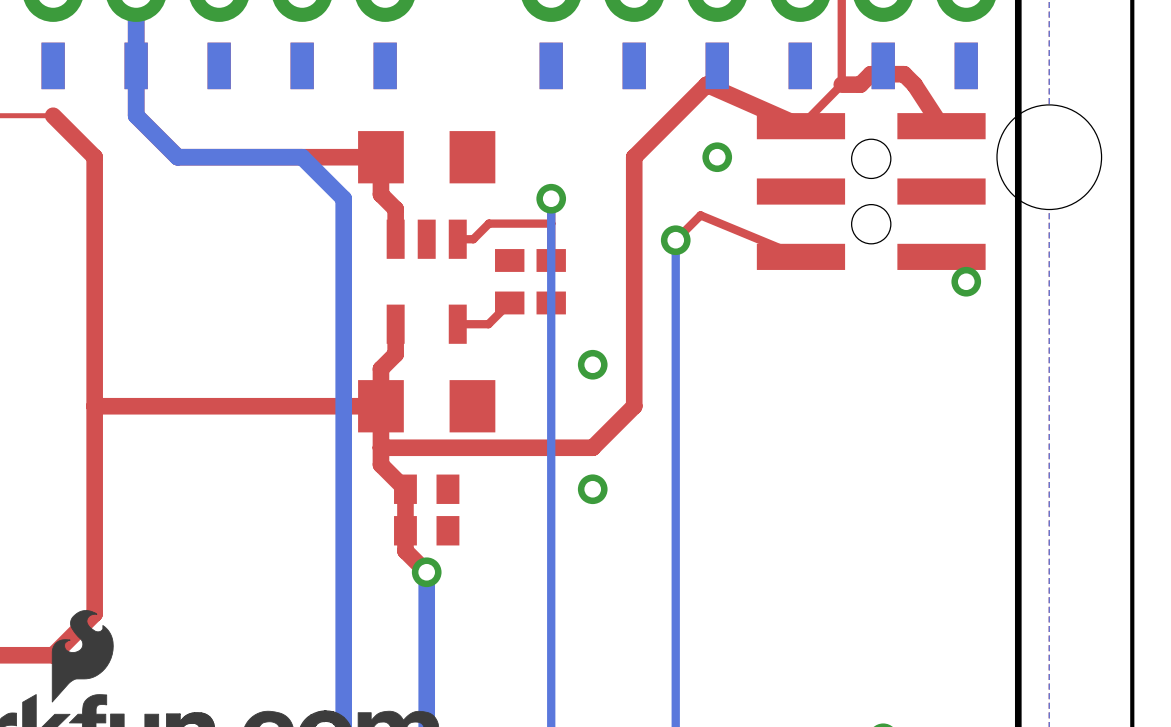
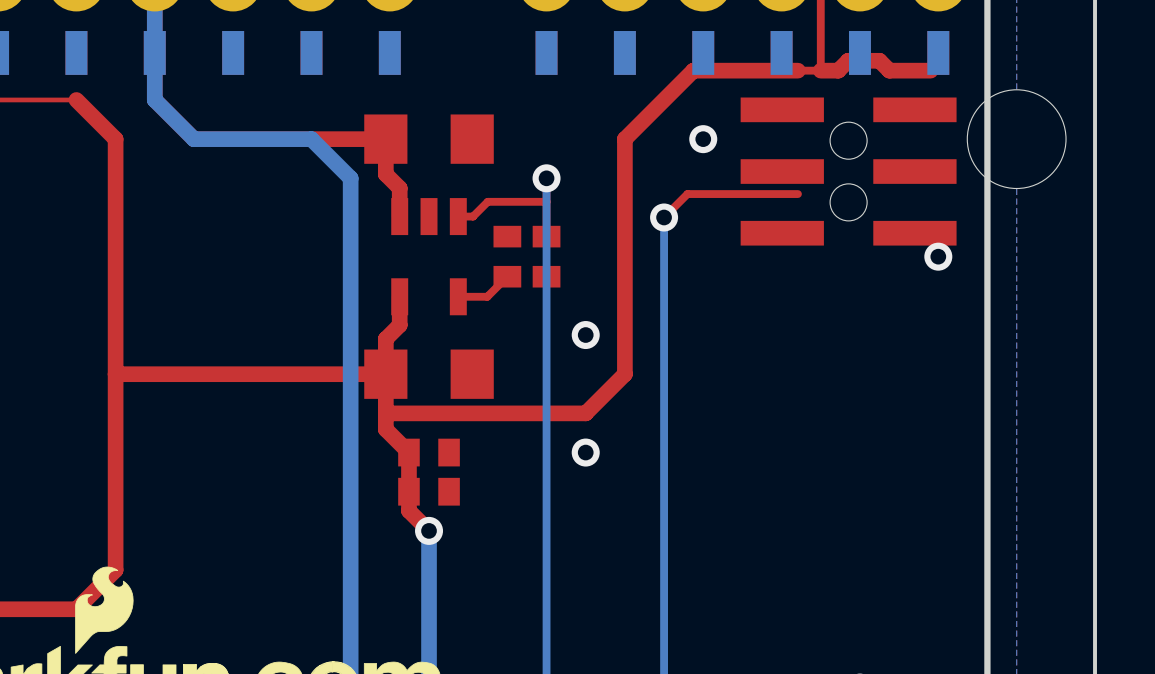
top track: (841, 84) (800, 126) (706, 84) -> (820, 70) (693, 70)
top track: (914, 84) (941, 126) -> (889, 70) (930, 70)
top track: (700, 215) (800, 256) -> (687, 194) (797, 194)

